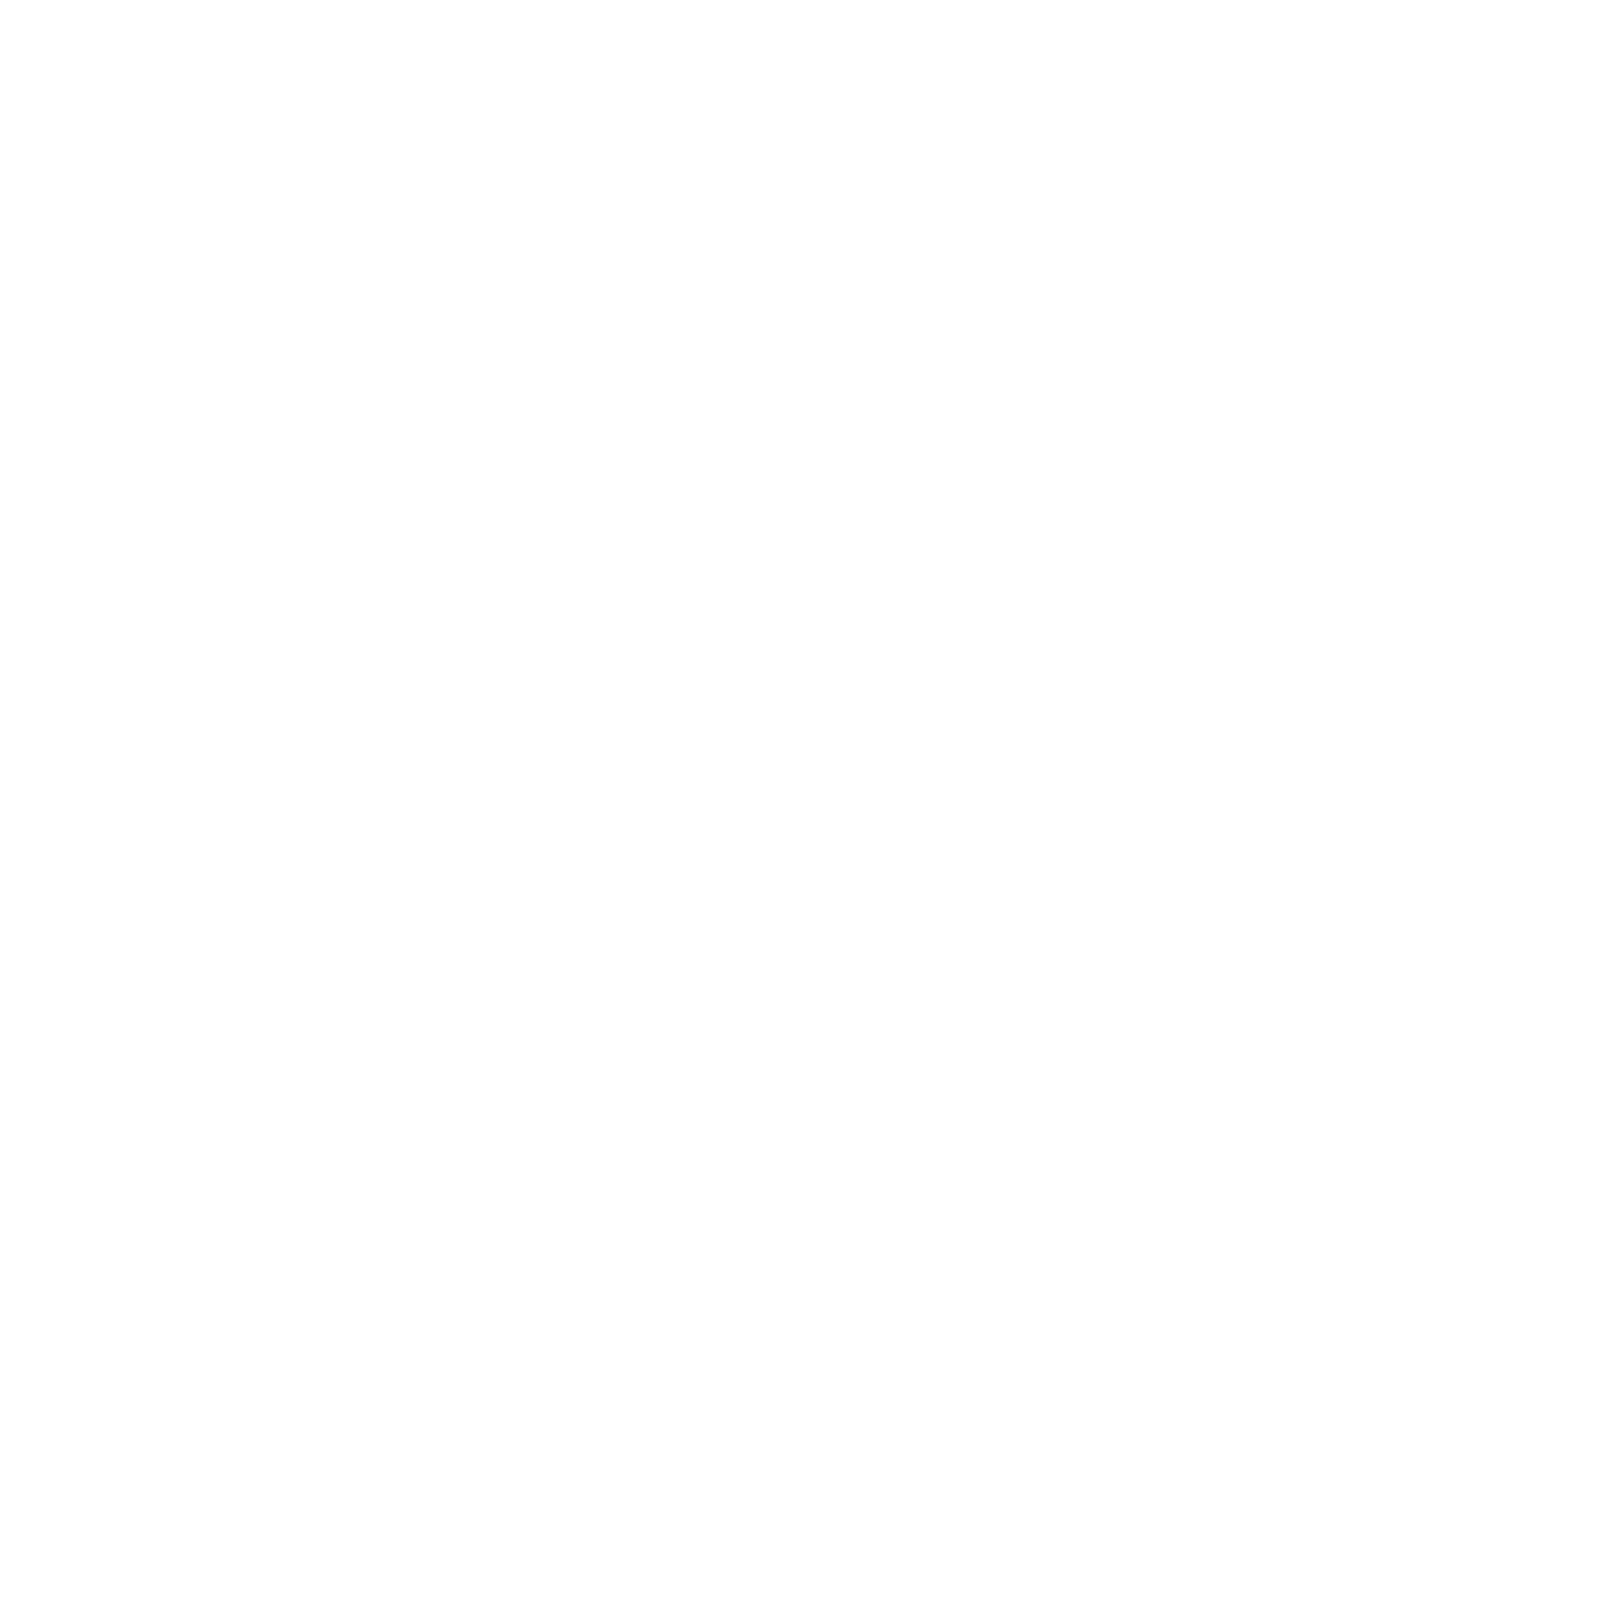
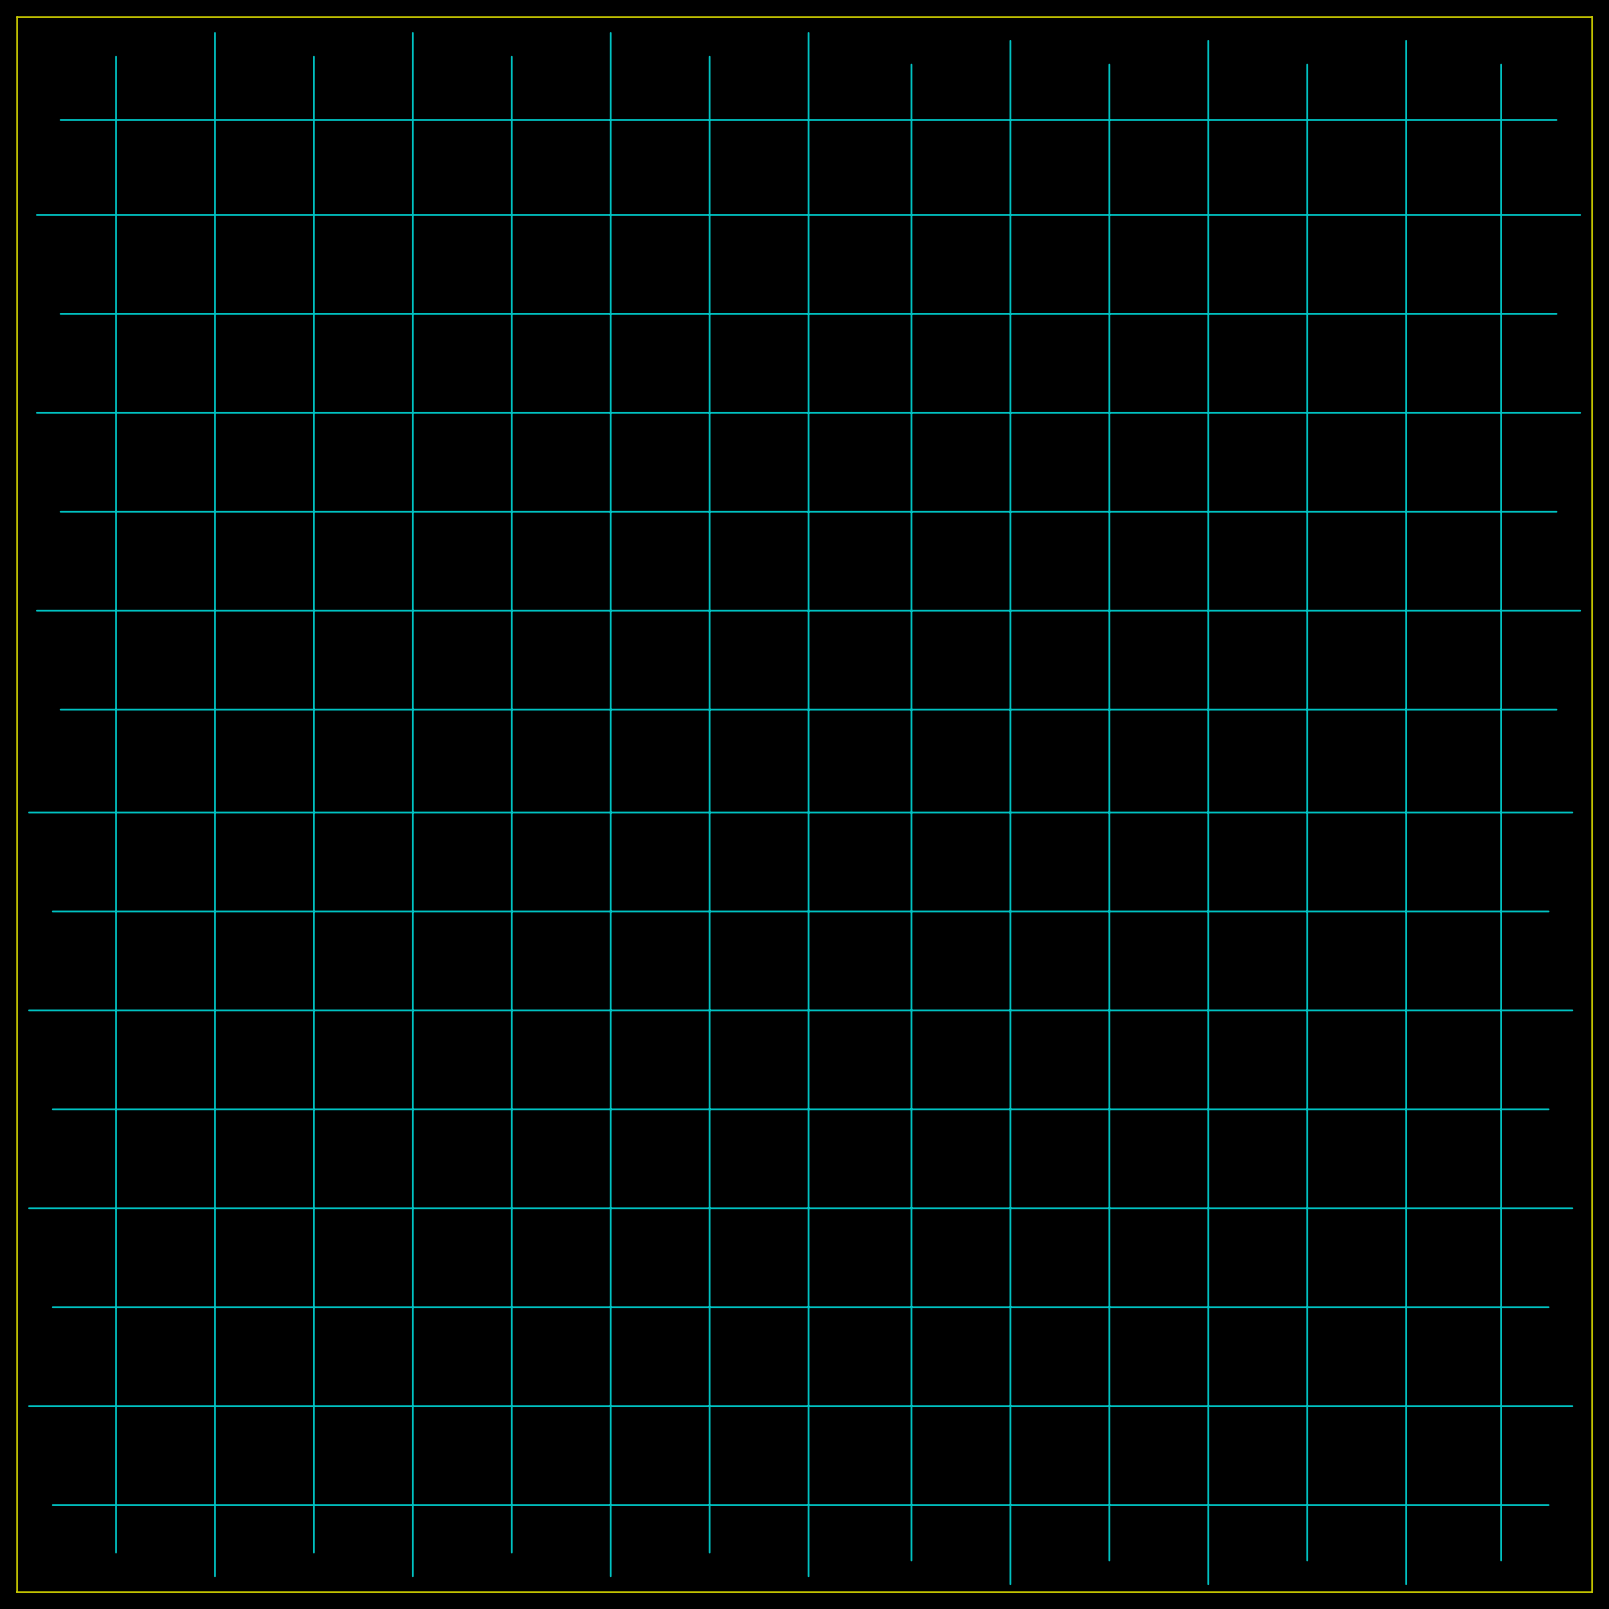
board edge: none -> (17, 17) (1592, 17) (1592, 1592) (17, 1592) (17, 17)
line: none -> (214, 32) (214, 1576)
line: none -> (412, 32) (412, 1576)
line: none -> (610, 32) (610, 1576)
line: none -> (808, 32) (808, 1576)
line: none -> (1010, 40) (1010, 1584)
line: none -> (1208, 40) (1208, 1584)
line: none -> (1406, 40) (1406, 1584)
line: none -> (116, 56) (116, 1552)
line: none -> (313, 56) (313, 1552)
line: none -> (511, 56) (511, 1552)
line: none -> (709, 56) (709, 1552)
line: none -> (911, 64) (911, 1560)
line: none -> (1109, 64) (1109, 1560)
line: none -> (1307, 64) (1307, 1560)
line: none -> (1501, 64) (1501, 1560)
line: none -> (60, 119) (1556, 119)
line: none -> (36, 214) (1580, 214)
line: none -> (60, 313) (1556, 313)
line: none -> (36, 412) (1580, 412)
line: none -> (60, 511) (1556, 511)
line: none -> (36, 610) (1580, 610)
line: none -> (60, 709) (1556, 709)
line: none -> (28, 812) (1572, 812)
line: none -> (52, 911) (1548, 911)
line: none -> (28, 1010) (1572, 1010)
line: none -> (52, 1109) (1548, 1109)
line: none -> (28, 1208) (1572, 1208)
line: none -> (52, 1307) (1548, 1307)
line: none -> (28, 1406) (1572, 1406)
line: none -> (52, 1505) (1548, 1505)

